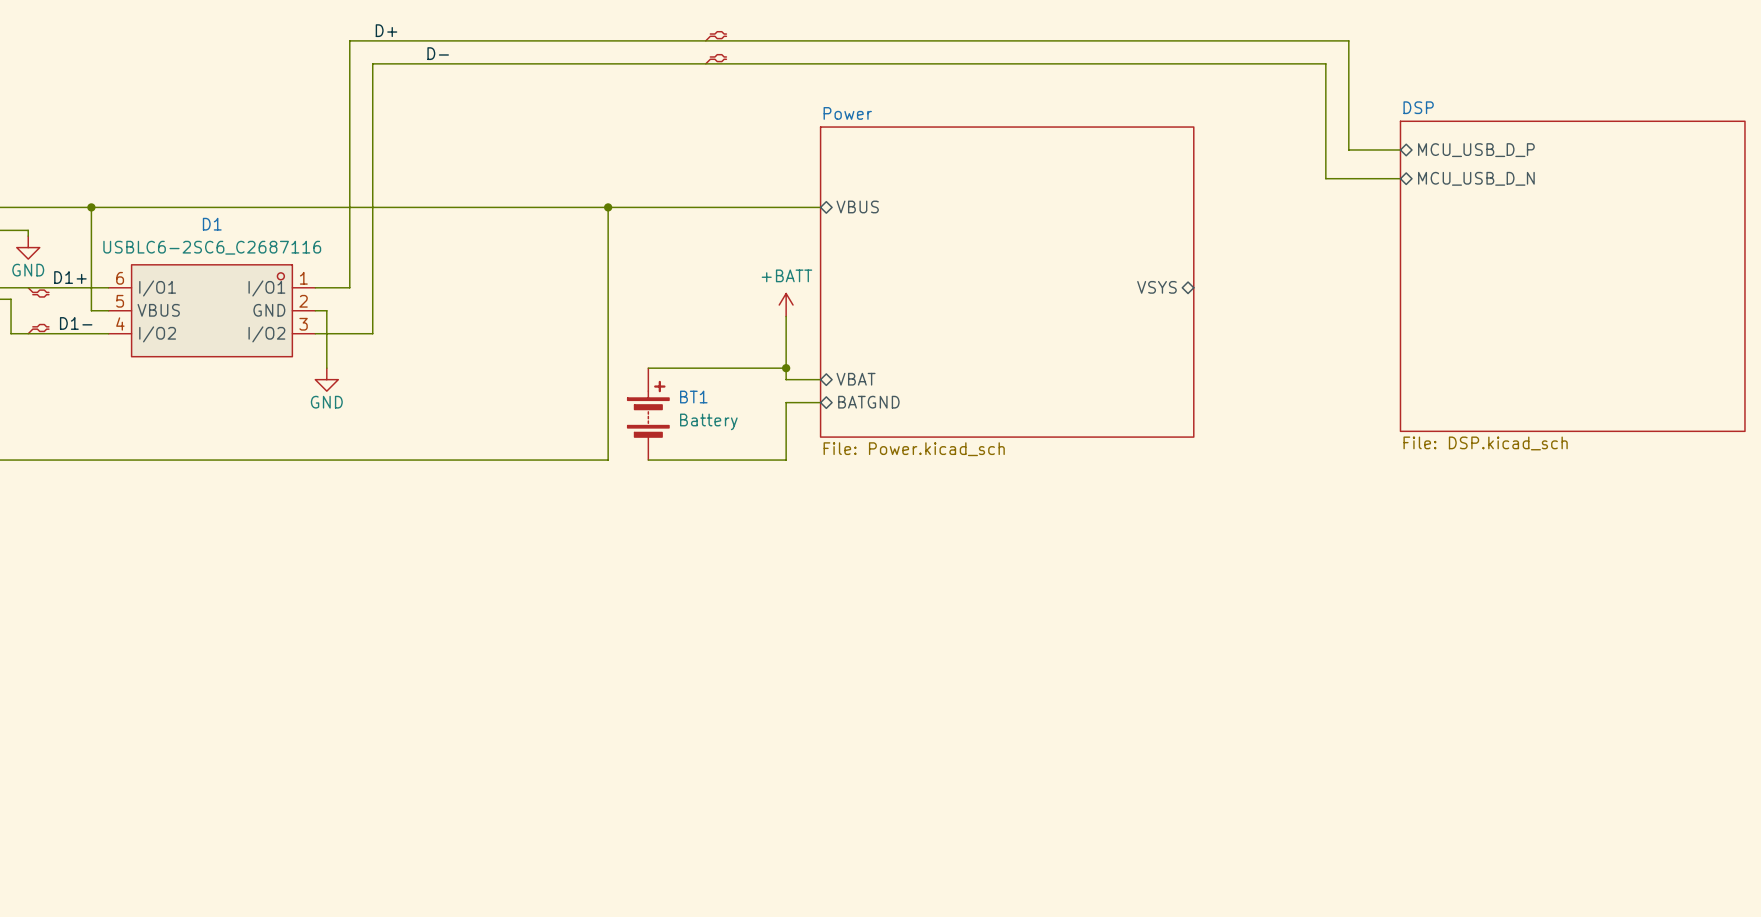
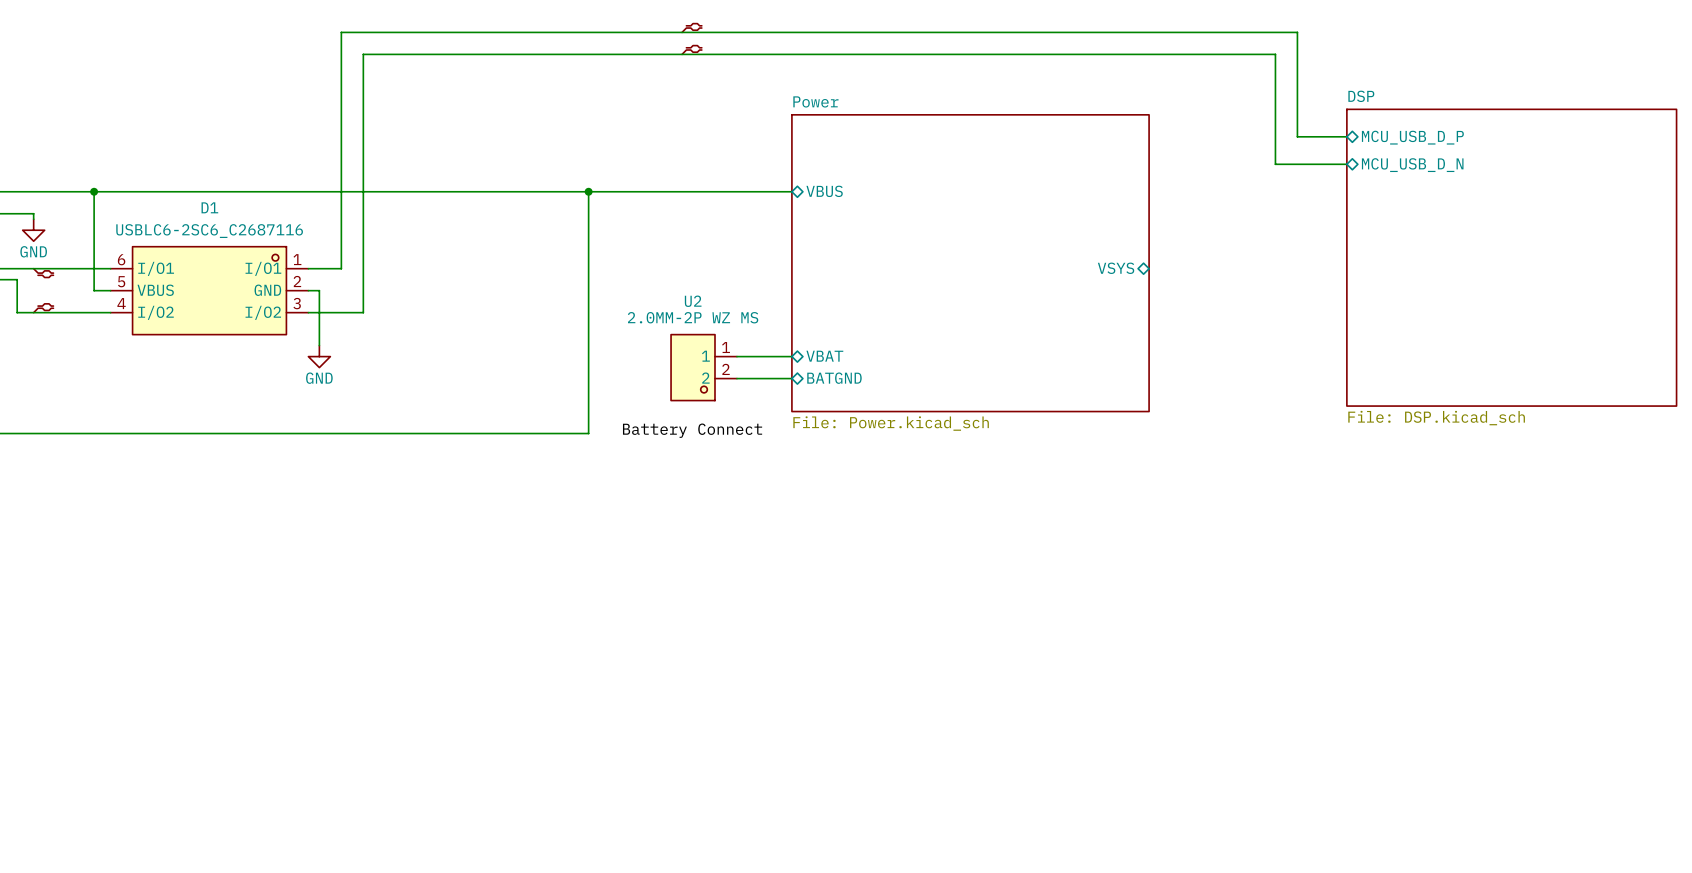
label: D+ (386, 30) -> none
label: D- (438, 53) -> none
label: D1+ (70, 277) -> none
power symbol: +BATT (786, 305) -> none
wire: (786, 316) (786, 379) -> (736, 356) (758, 356)
label: D1- (76, 323) -> none
wire: (648, 368) (786, 368) -> none
junction: (786, 368) -> none
U2: none -> 2.0MM-2P WZ MS (704, 367)
wire: (786, 402) (786, 460) (648, 460) -> (758, 378) (736, 378)
BT1: Battery (648, 414) -> none
label: none -> Battery Connect (692, 430)

